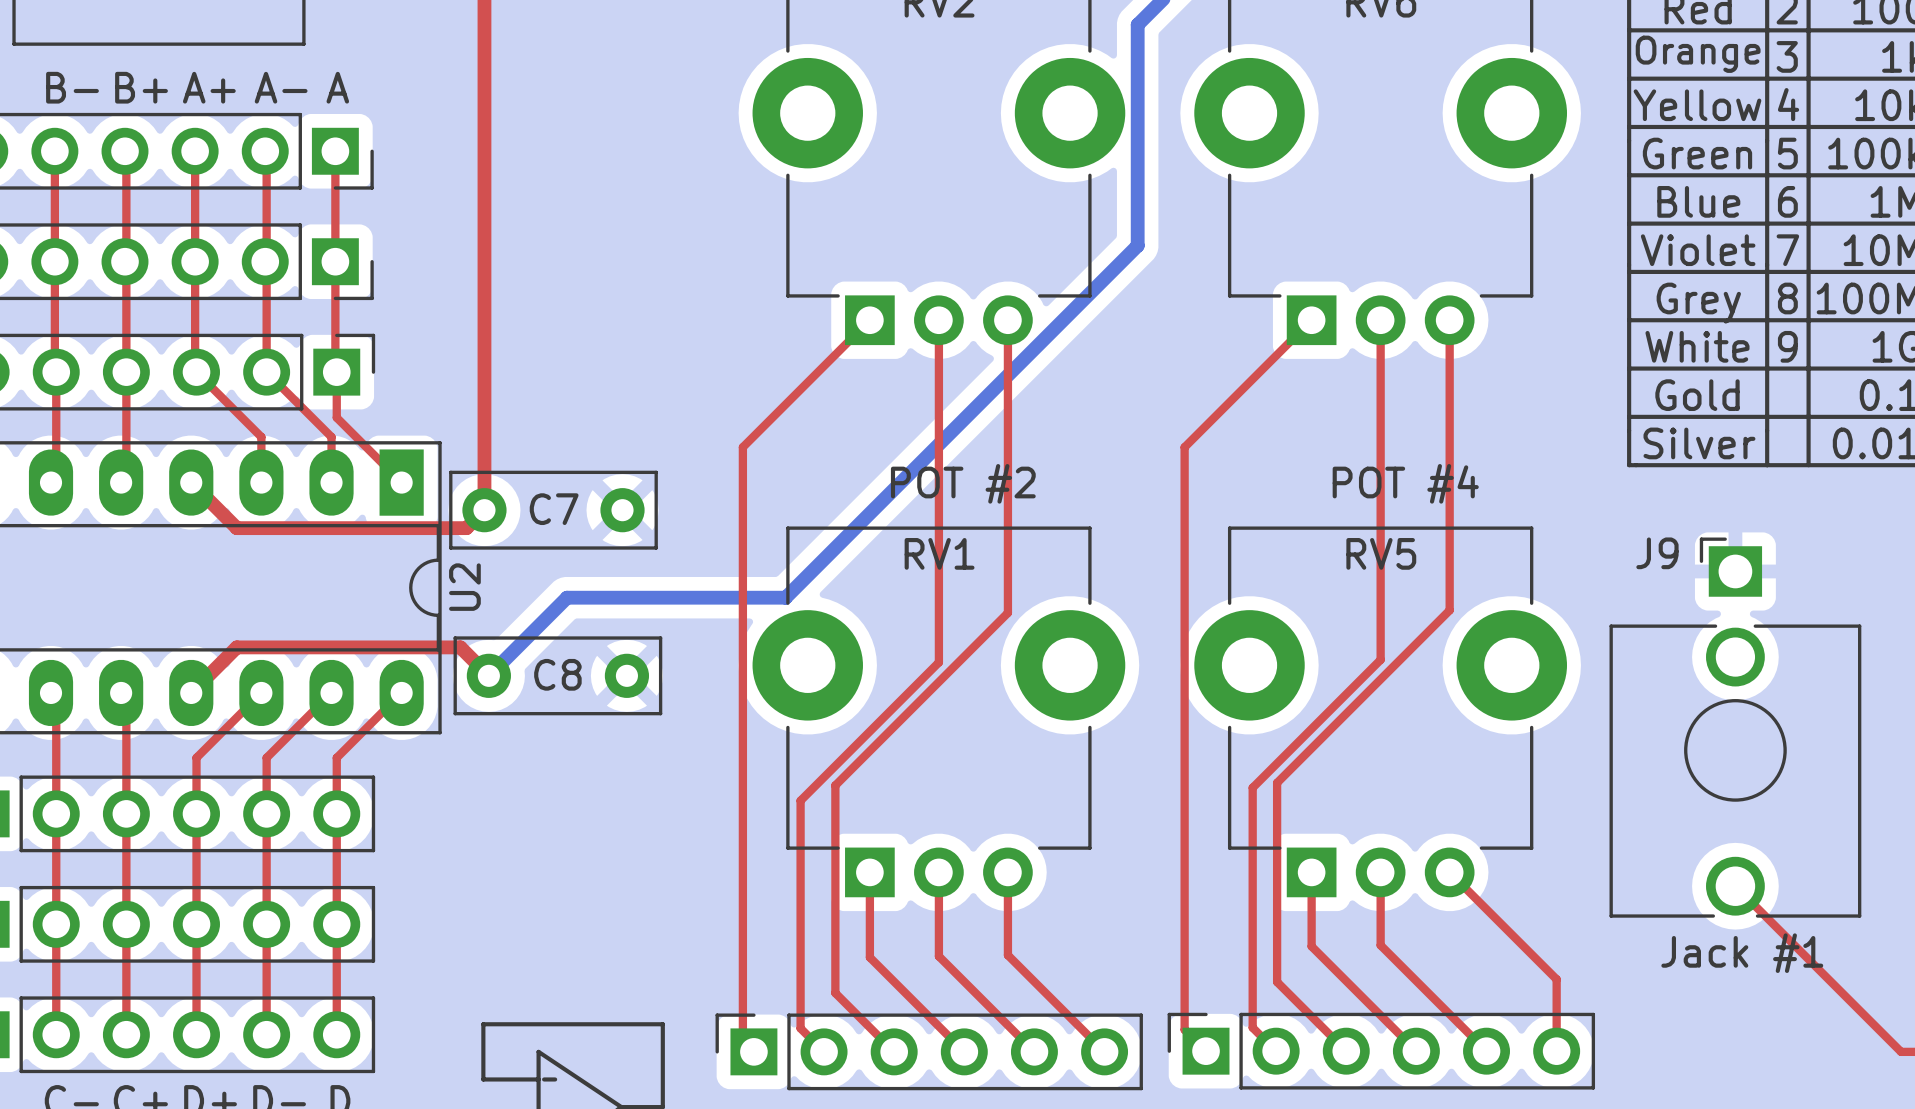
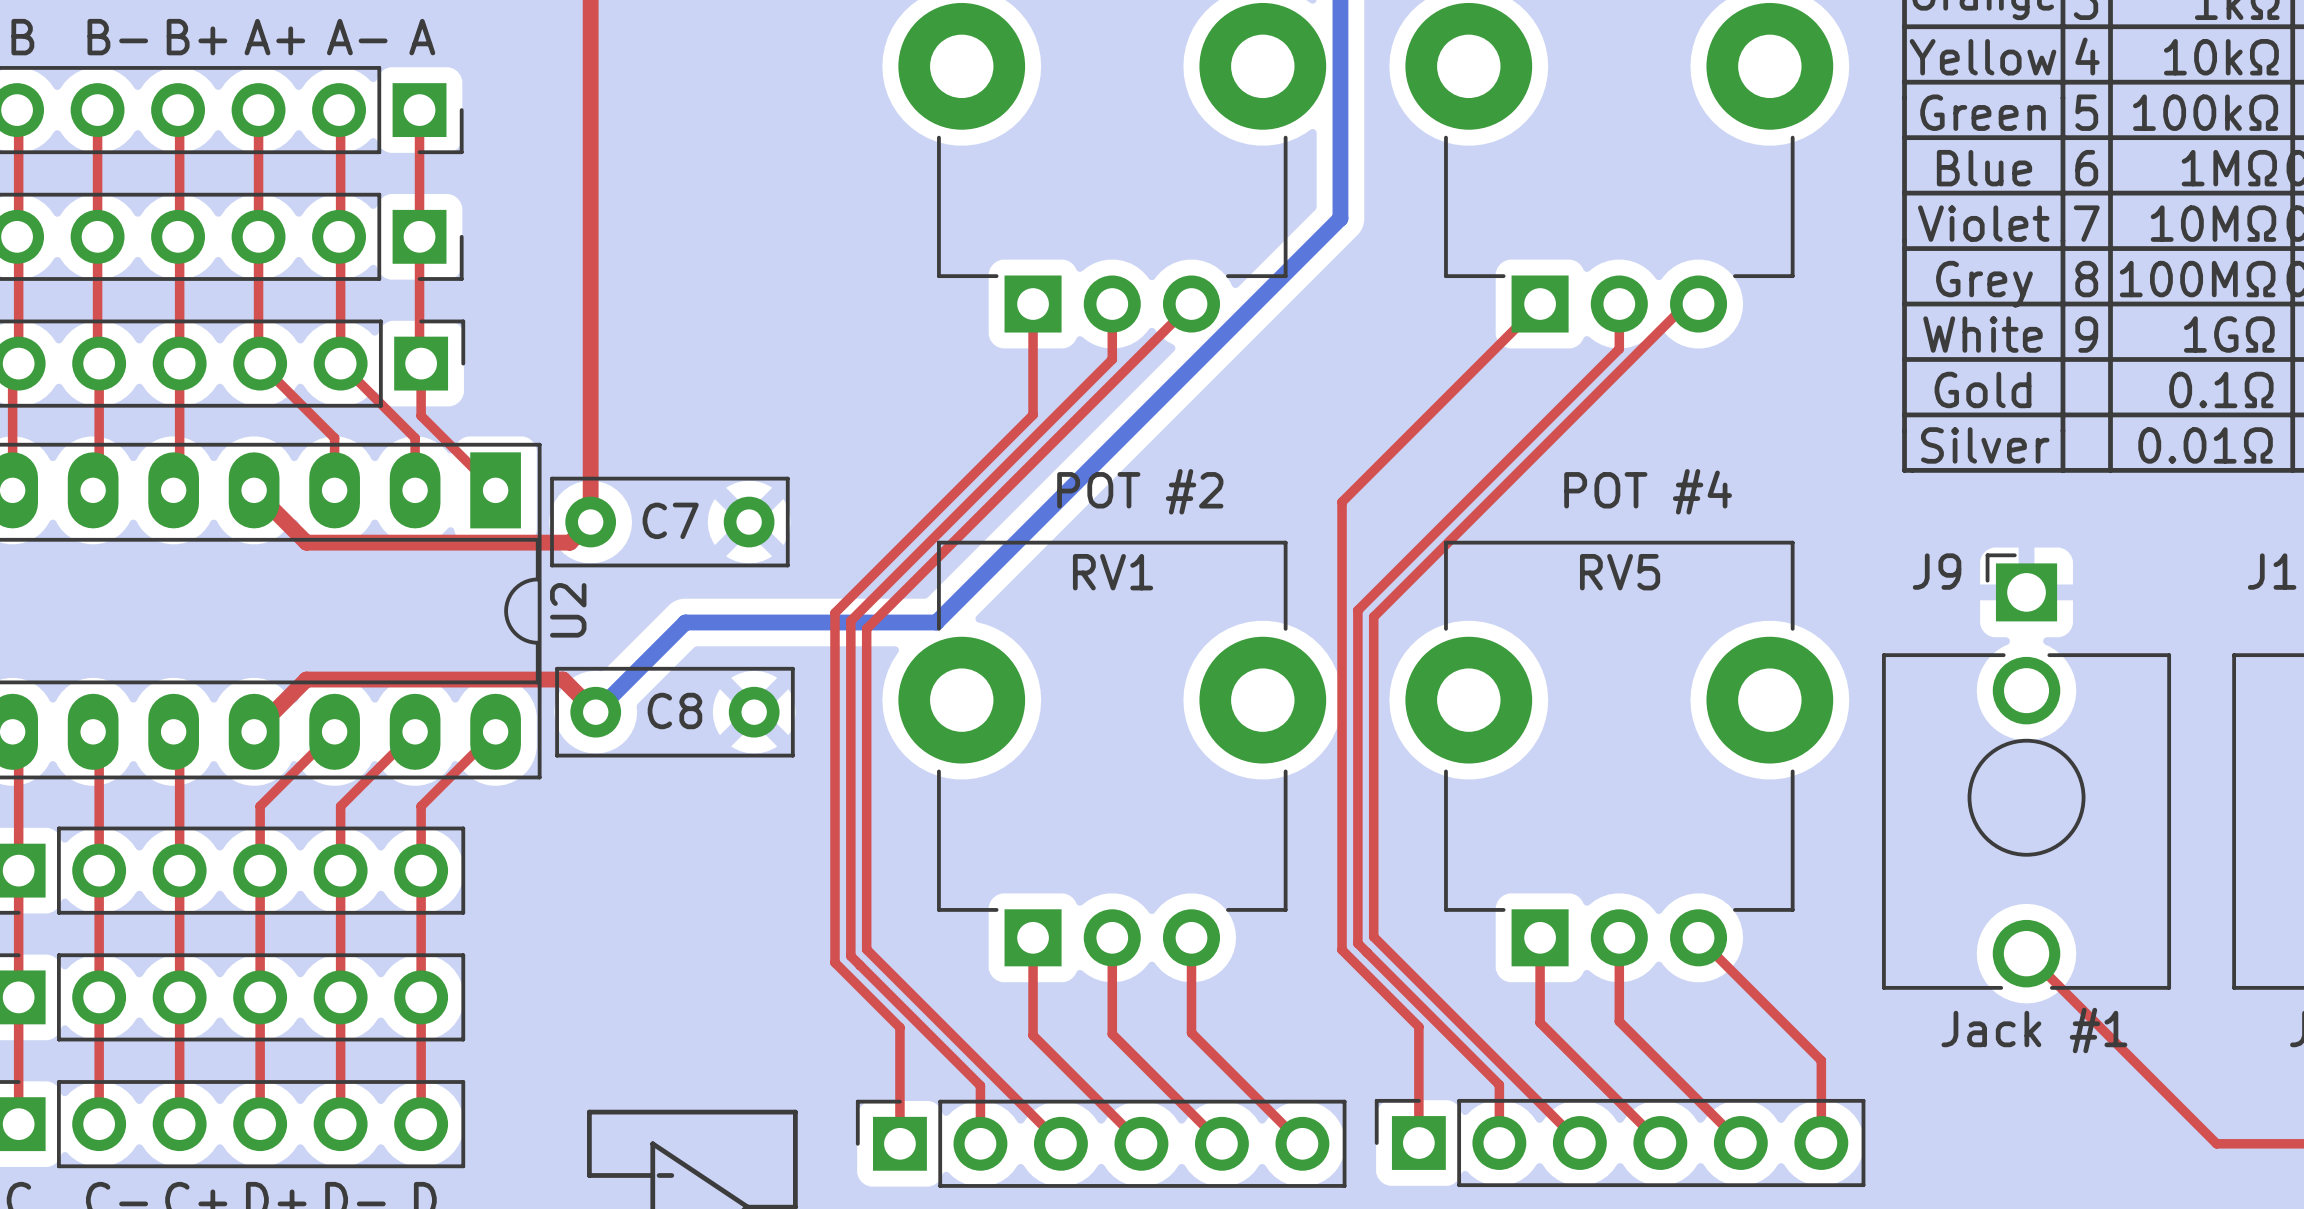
top track: (869, 320) (742, 447) (742, 1040) (753, 1051) -> (1033, 304) (1033, 414) (834, 612) (834, 962) (899, 1027) (899, 1143)
top track: (1007, 320) (1007, 612) (835, 785) (835, 993) -> (1191, 304) (866, 628) (866, 949) (993, 1076)
top track: (1449, 320) (1449, 610) (1277, 782) (1277, 982) -> (1698, 304) (1686, 304) (1373, 616) (1373, 936) (1500, 1063)
top track: (1380, 359) (1380, 659) (1252, 787) (1252, 1027) (1276, 1051) -> (1619, 348) (1357, 610) (1357, 943) (1499, 1084) (1499, 1143)
top track: (938, 368) (938, 662) (800, 800) (800, 1028) (824, 1051) -> (1112, 359) (850, 620) (850, 956) (980, 1085) (980, 1143)
top track: (1184, 447) (1184, 1029) (1206, 1051) -> (1394, 449) (1342, 502) (1342, 949) (1418, 1026) (1418, 1143)

